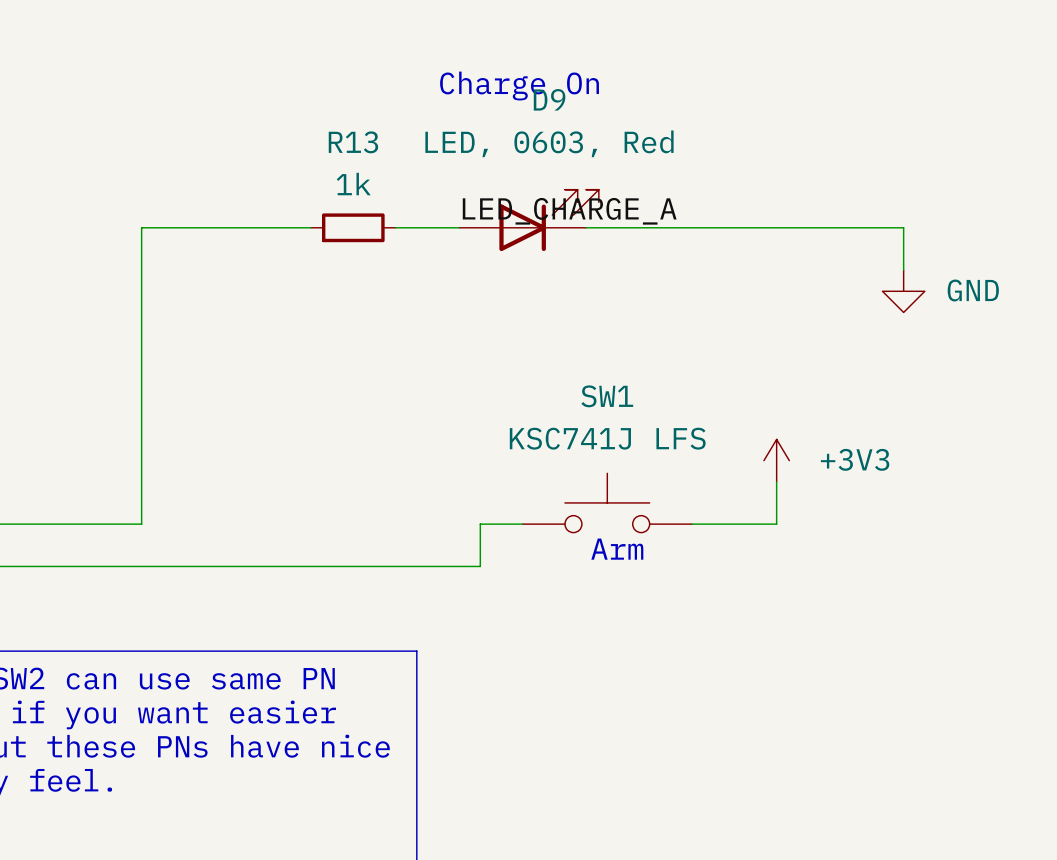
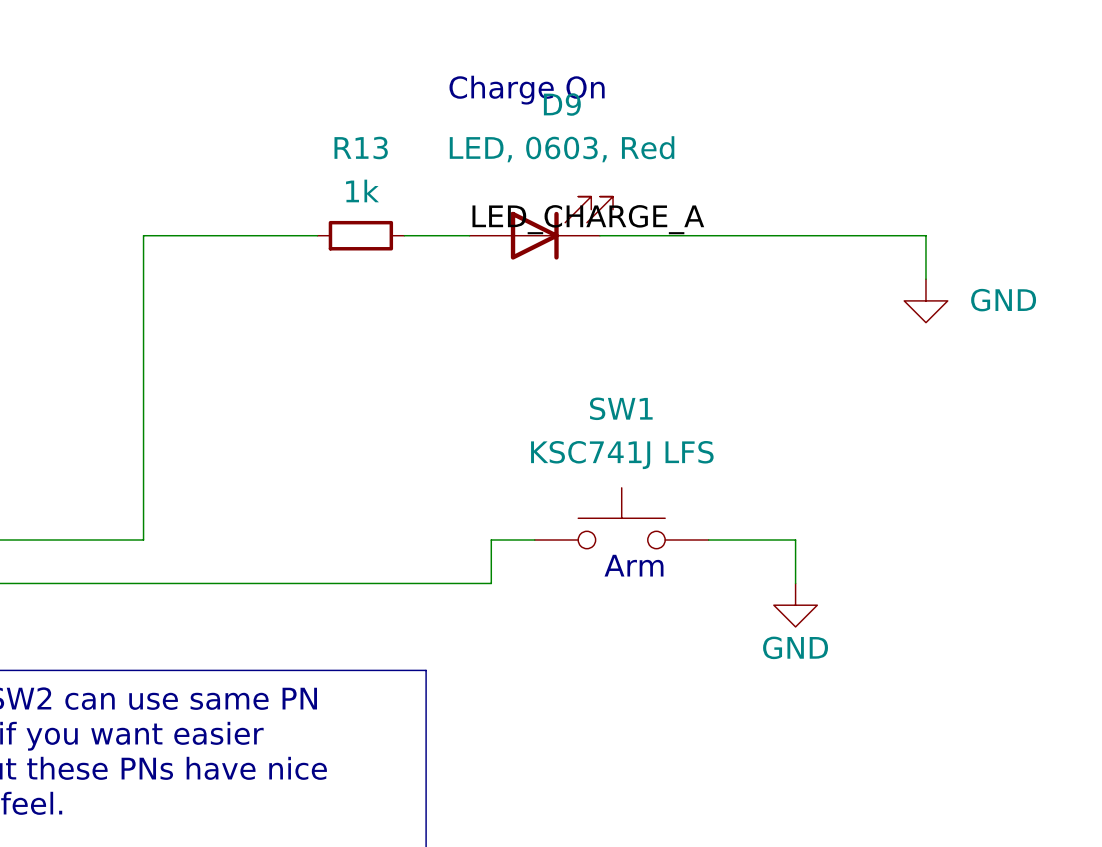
power symbol: +3V3 (776, 460) -> none
wire: (776, 481) (776, 524) -> (795, 583) (795, 540)
power symbol: none -> GND (795, 605)

